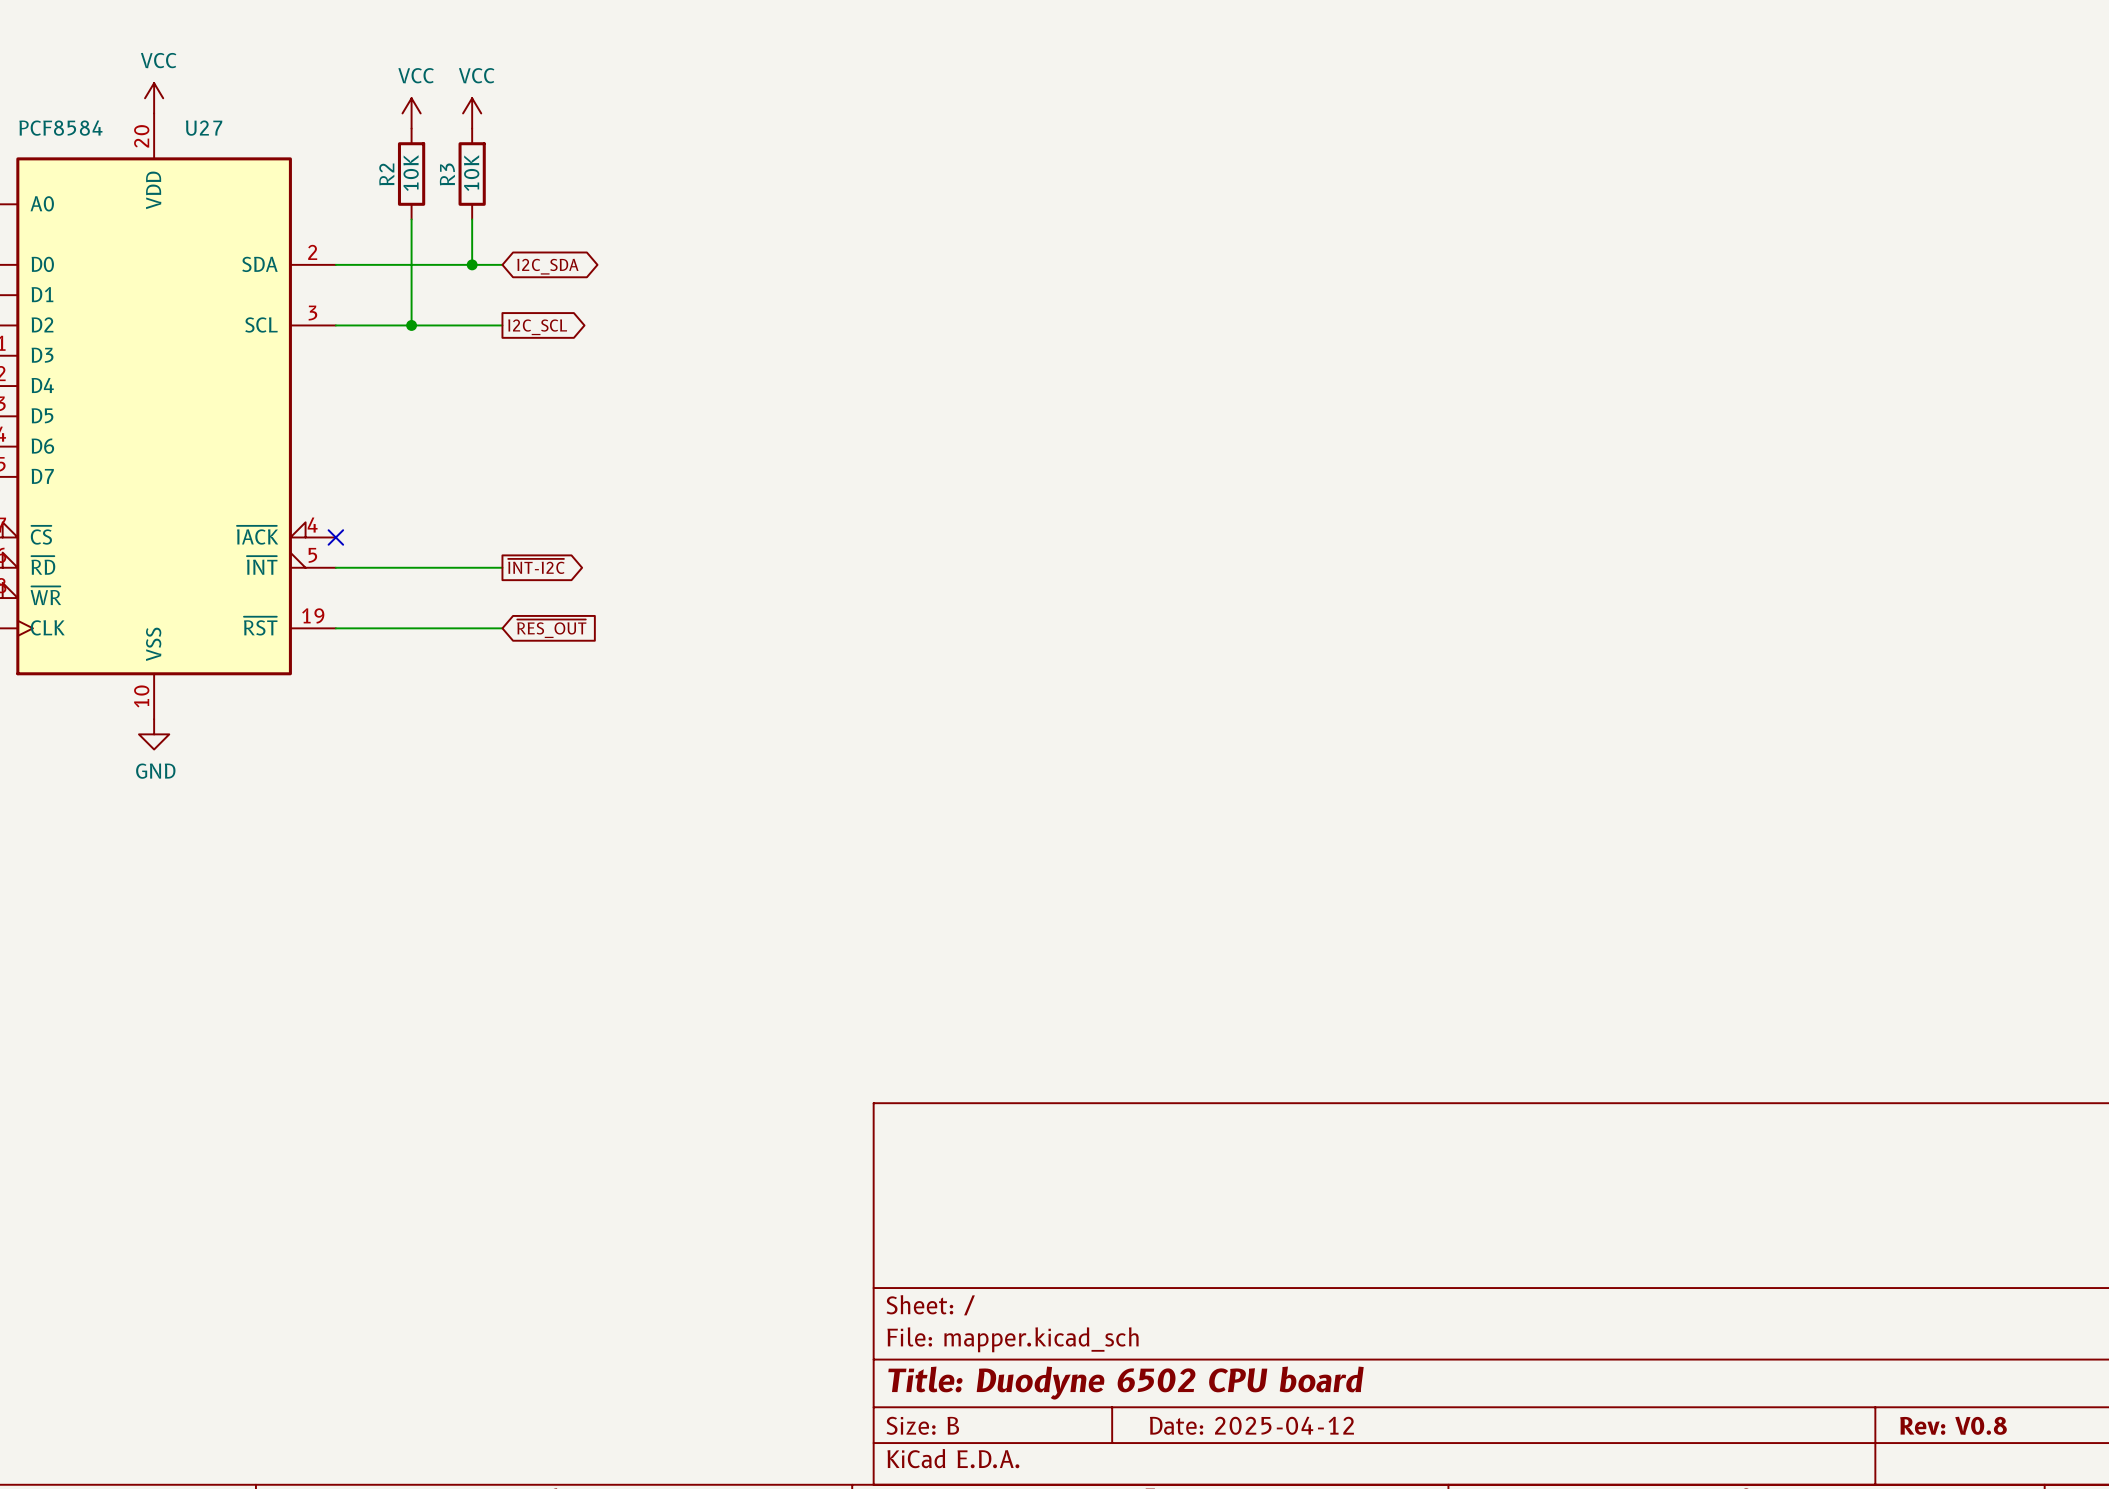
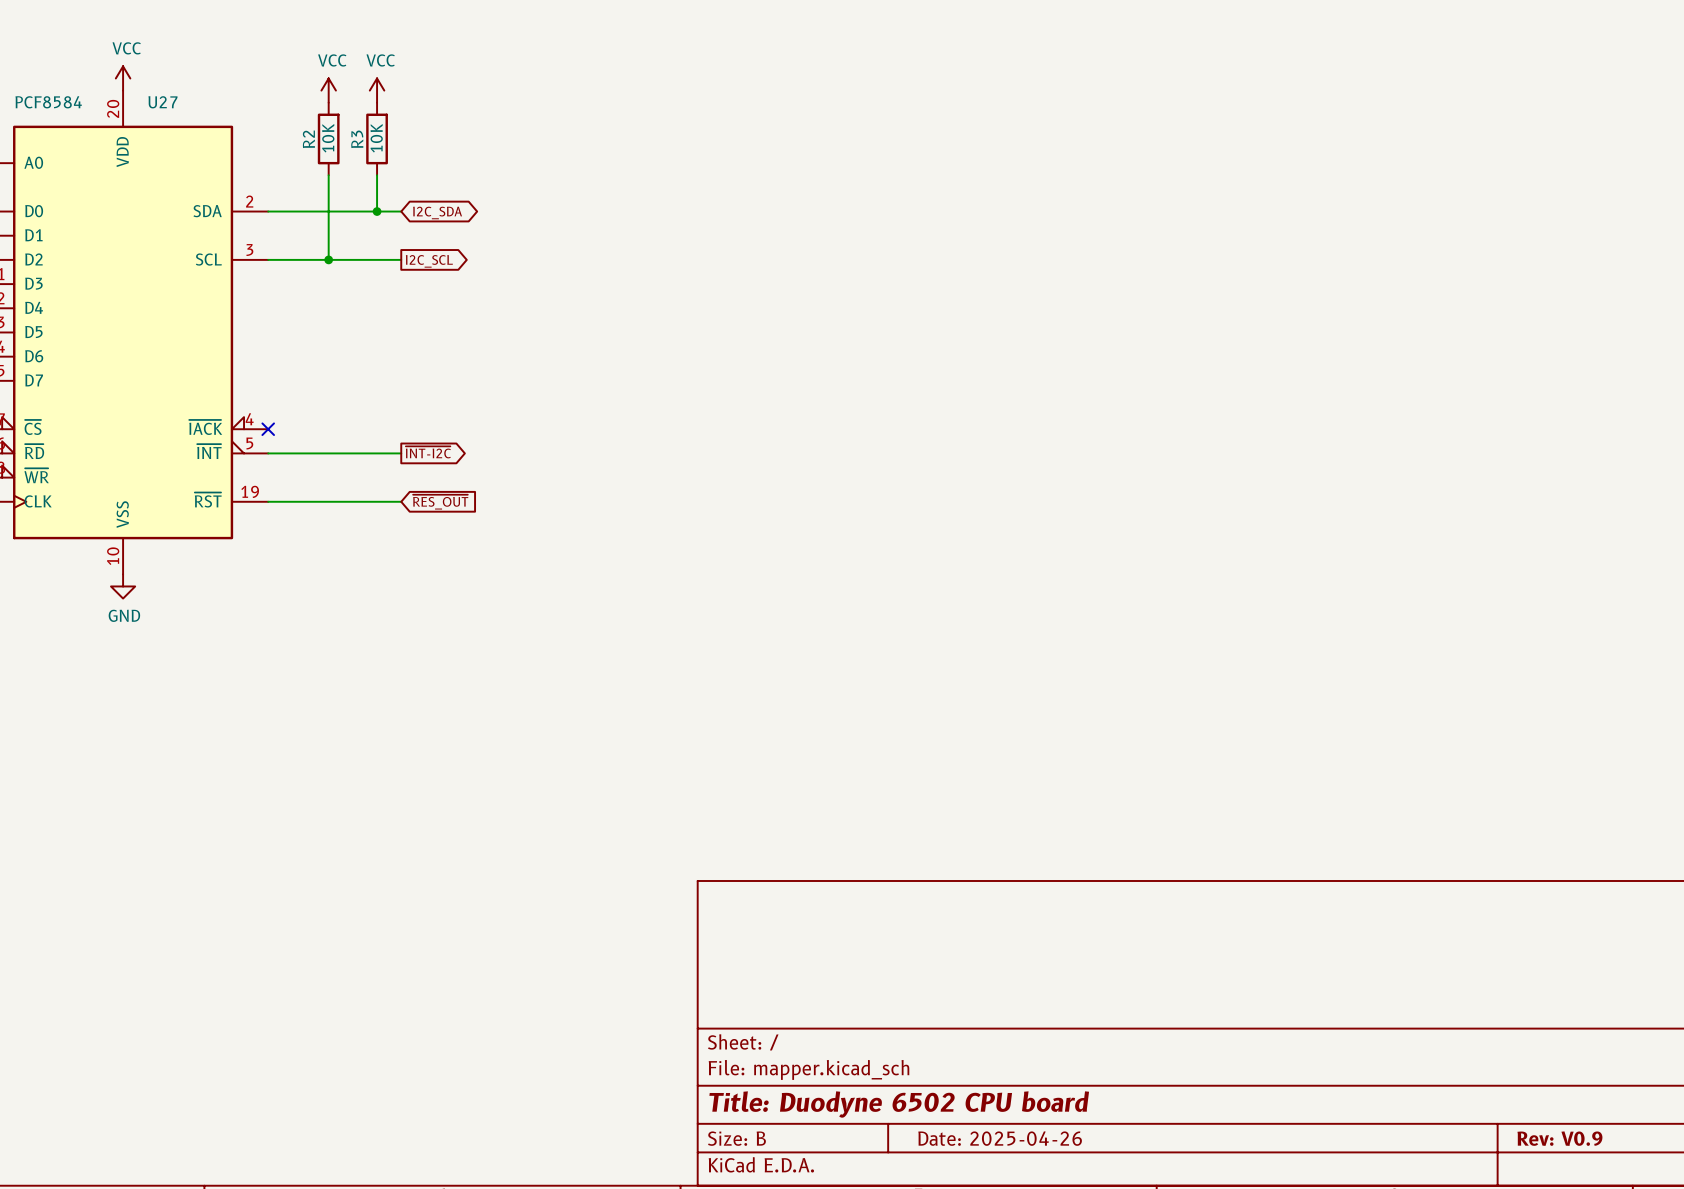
title block: Date: 2025-04-12 (1251, 1425) -> Date: 2025-04-26 (1000, 1138)
title block: Rev: V0.8 (1953, 1425) -> Rev: V0.9 (1559, 1138)

